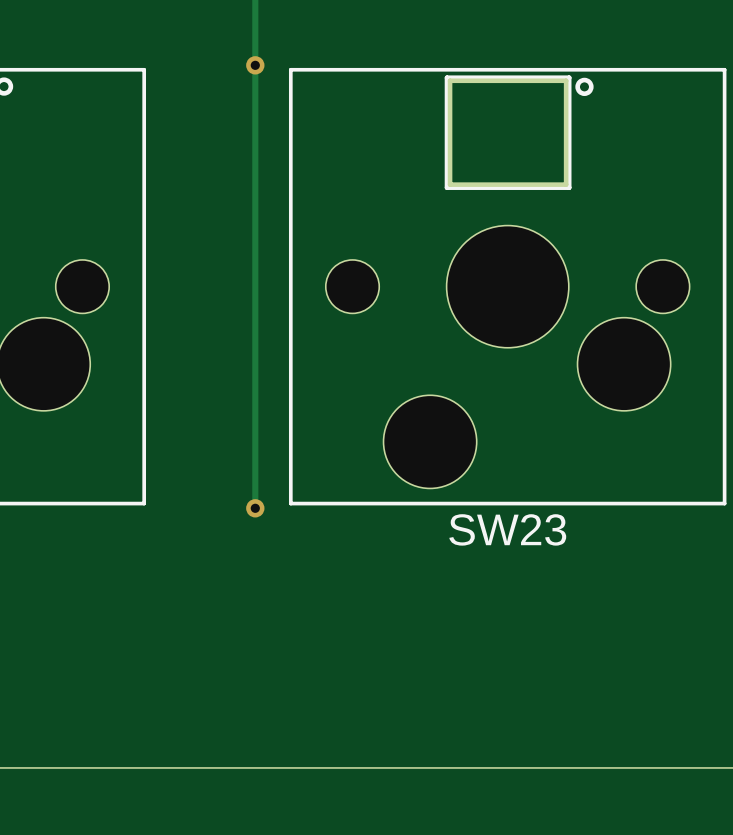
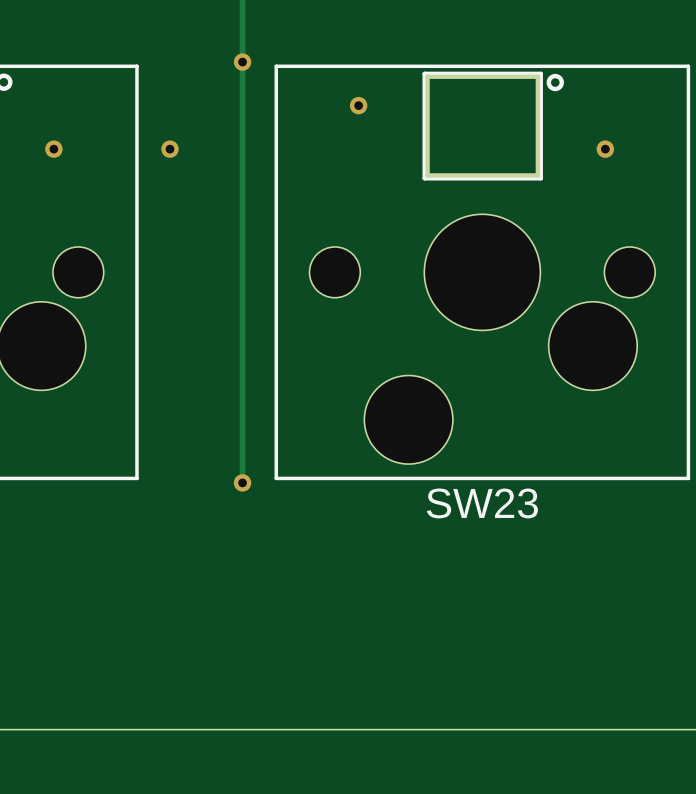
via: none -> (358, 105)
via: none -> (53, 149)
via: none -> (169, 149)
via: none -> (605, 149)

